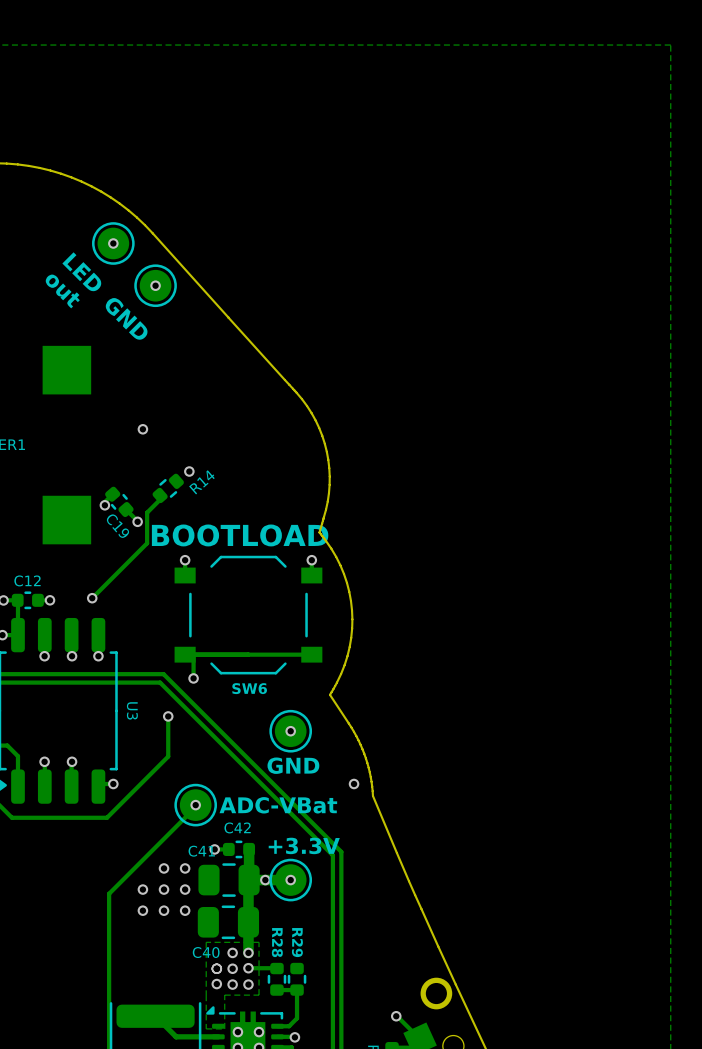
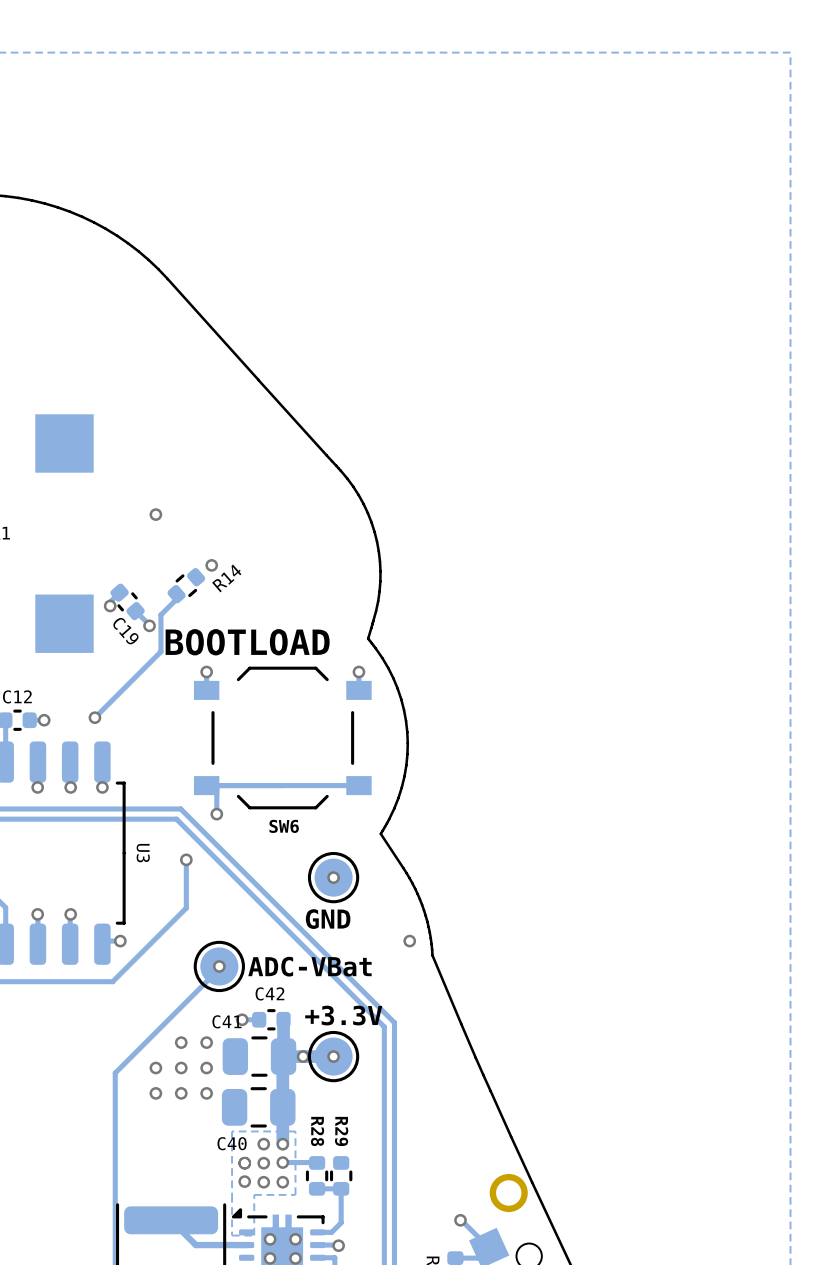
part: (113, 243) -> none
via: (113, 243) -> none
text: LED (81, 271) -> none
part: (155, 285) -> none
via: (155, 285) -> none
text: out (62, 291) -> none
text: GND (126, 318) -> none

